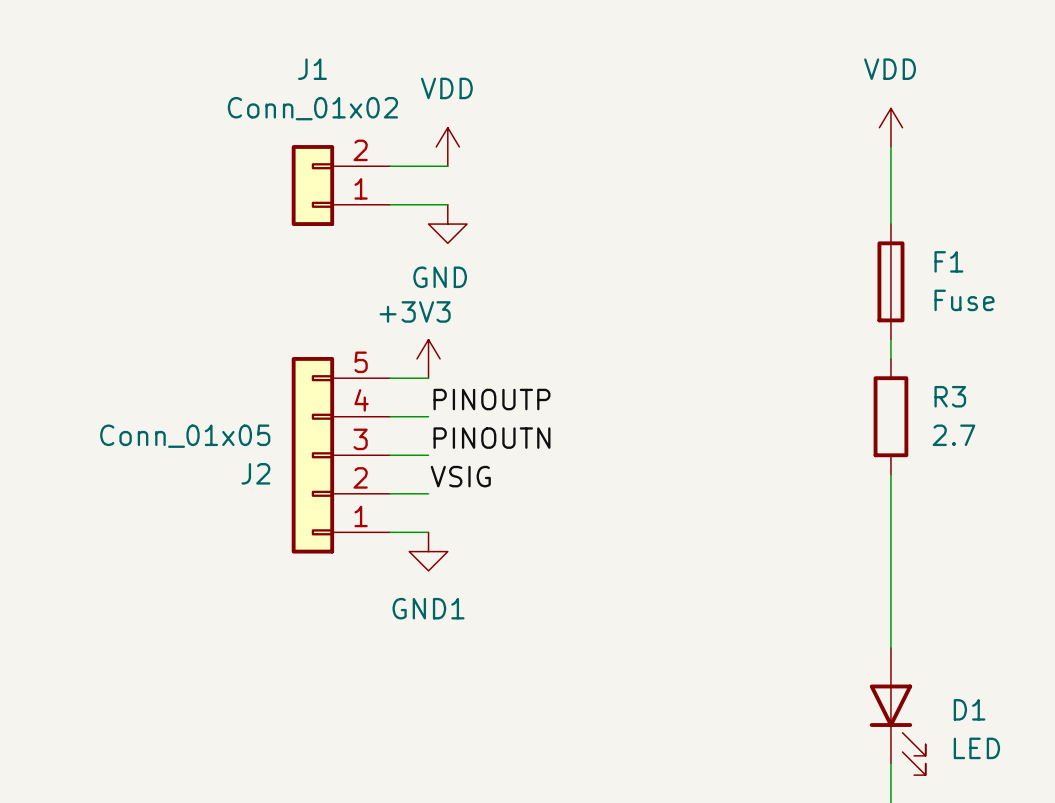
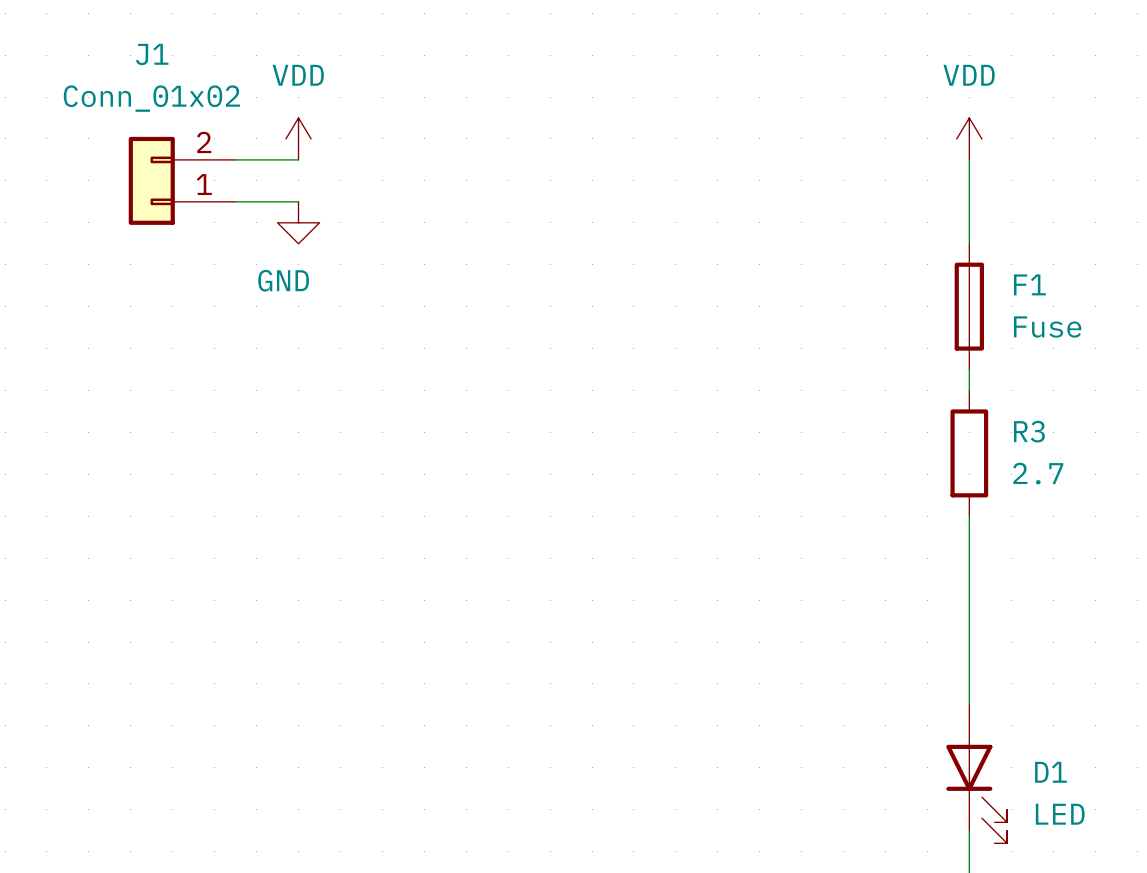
power symbol position: VDD (447, 146) -> VDD (298, 138)
wire: (389, 166) (447, 166) -> (235, 159) (298, 159)
J1 position: (340, 185) -> (182, 180)
wire: (389, 204) (447, 204) -> (235, 201) (298, 201)
power symbol position: GND (447, 224) -> GND (298, 222)
power symbol: +3V3 (428, 358) -> none
wire: (389, 378) (428, 378) -> none
label: PINOUTP (491, 399) -> none
wire: (389, 416) (428, 416) -> none
label: PINOUTN (491, 438) -> none
J2: Conn_01x05 (340, 455) -> none
wire: (389, 455) (428, 455) -> none
label: VSIG (460, 476) -> none
wire: (389, 493) (428, 493) -> none
wire: (389, 532) (428, 532) -> none
power symbol: GND1 (428, 551) -> none

